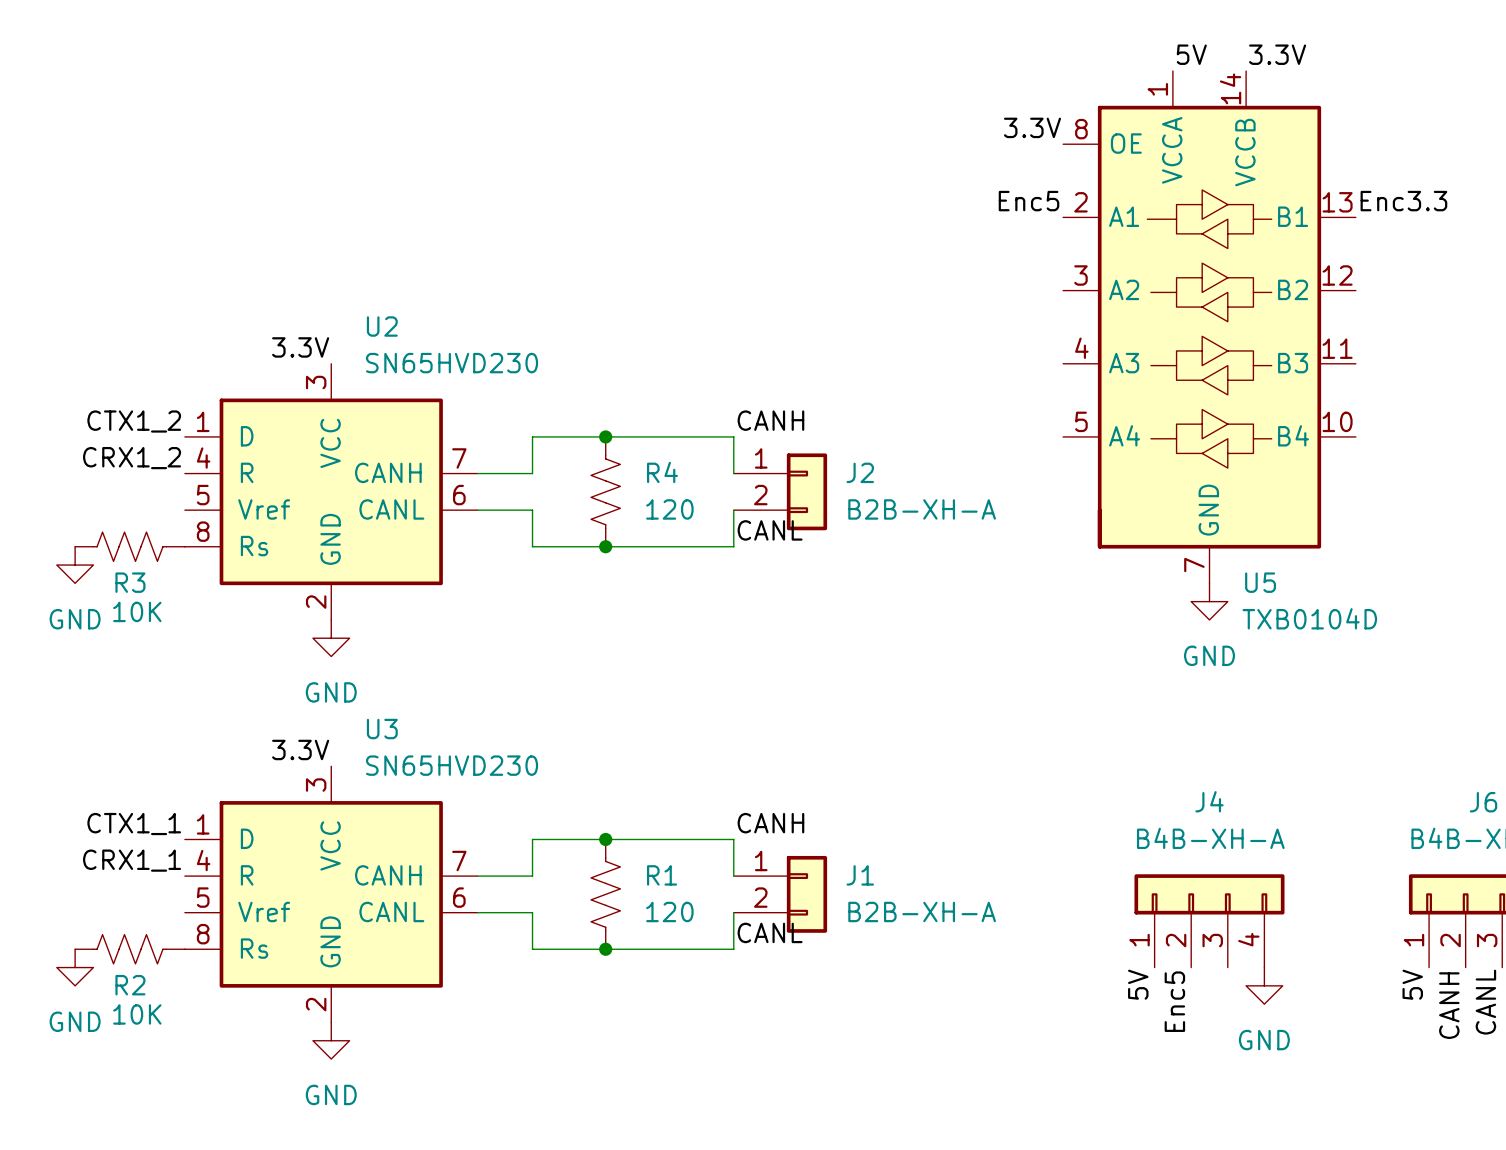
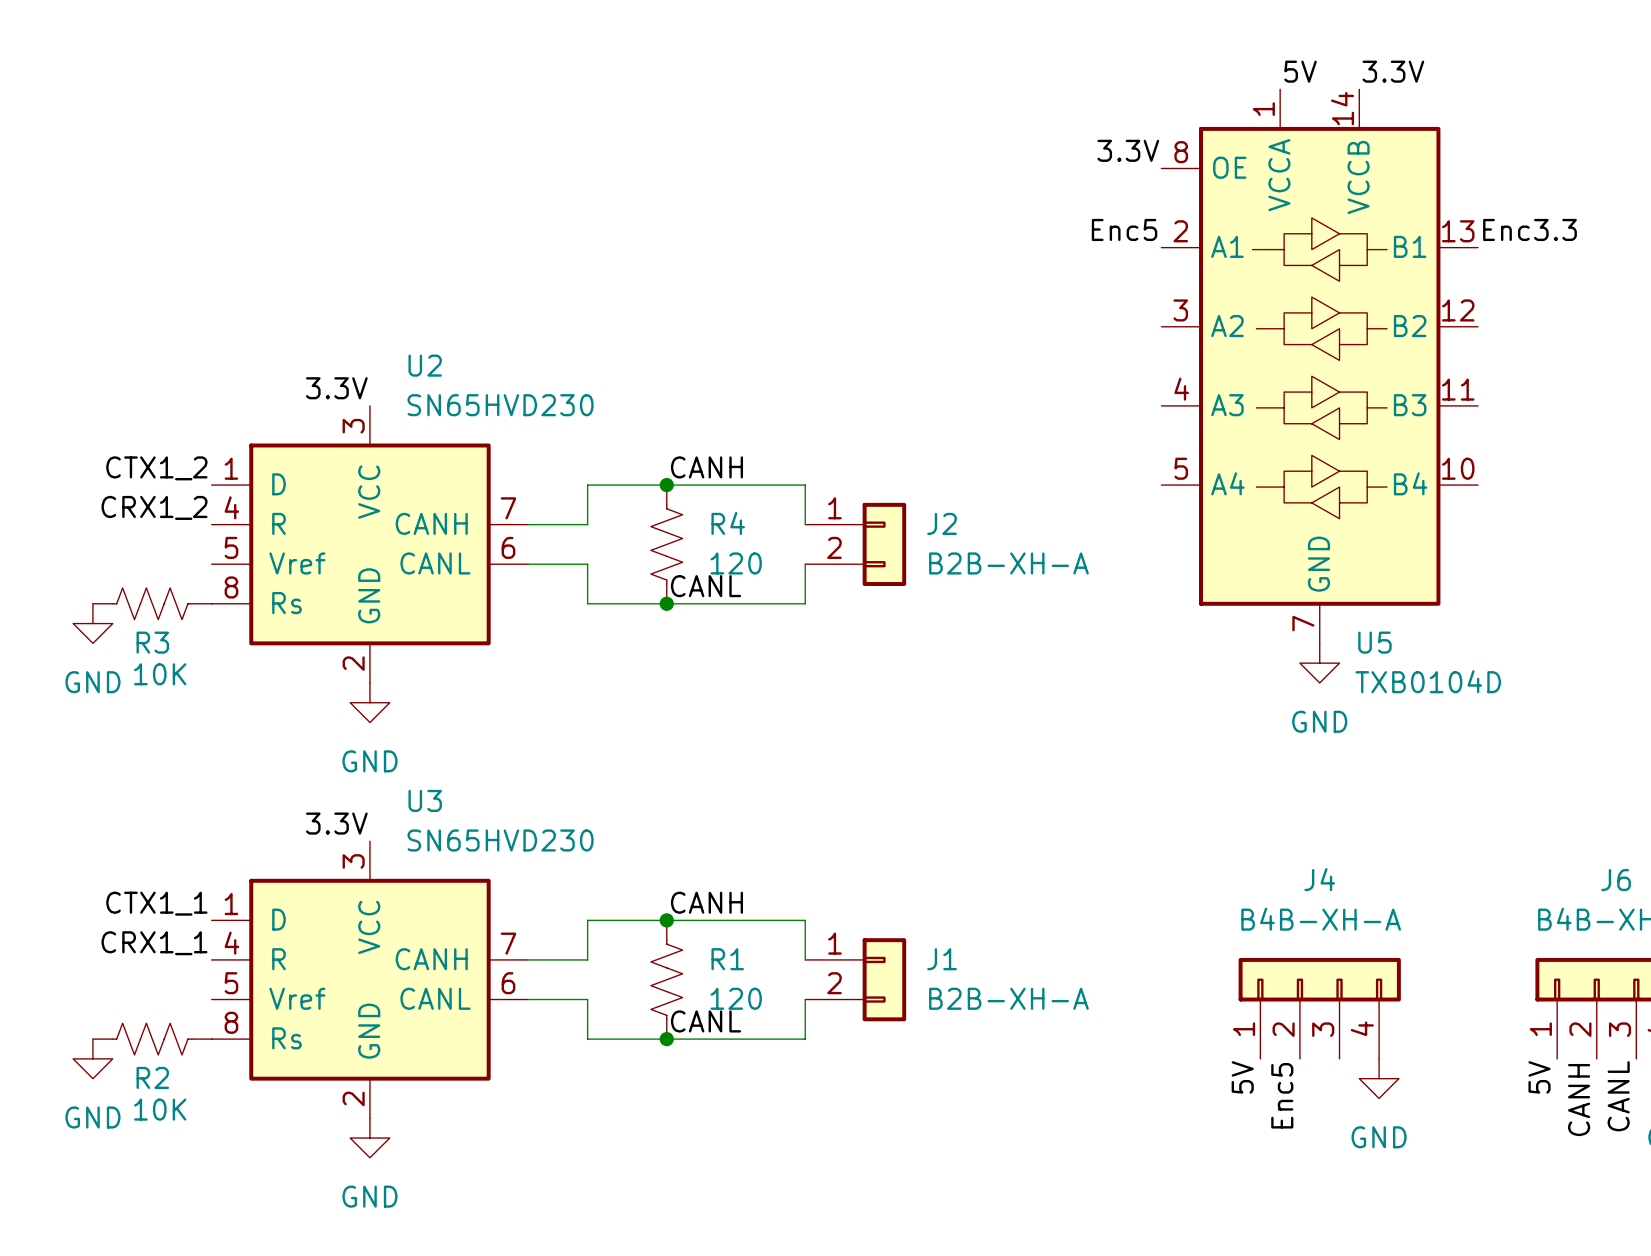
label position: CANH (770, 420) -> CANH (706, 467)
label position: CANL (770, 530) -> CANL (706, 586)
label position: CANH (770, 823) -> CANH (706, 902)
label position: CANL (770, 932) -> CANL (706, 1021)

